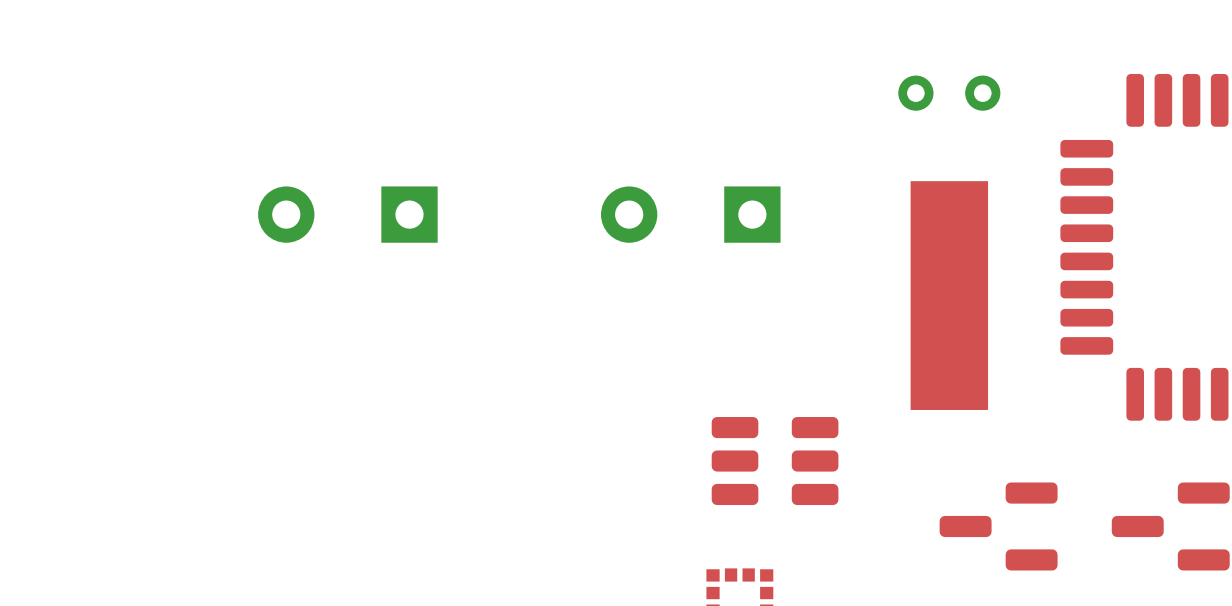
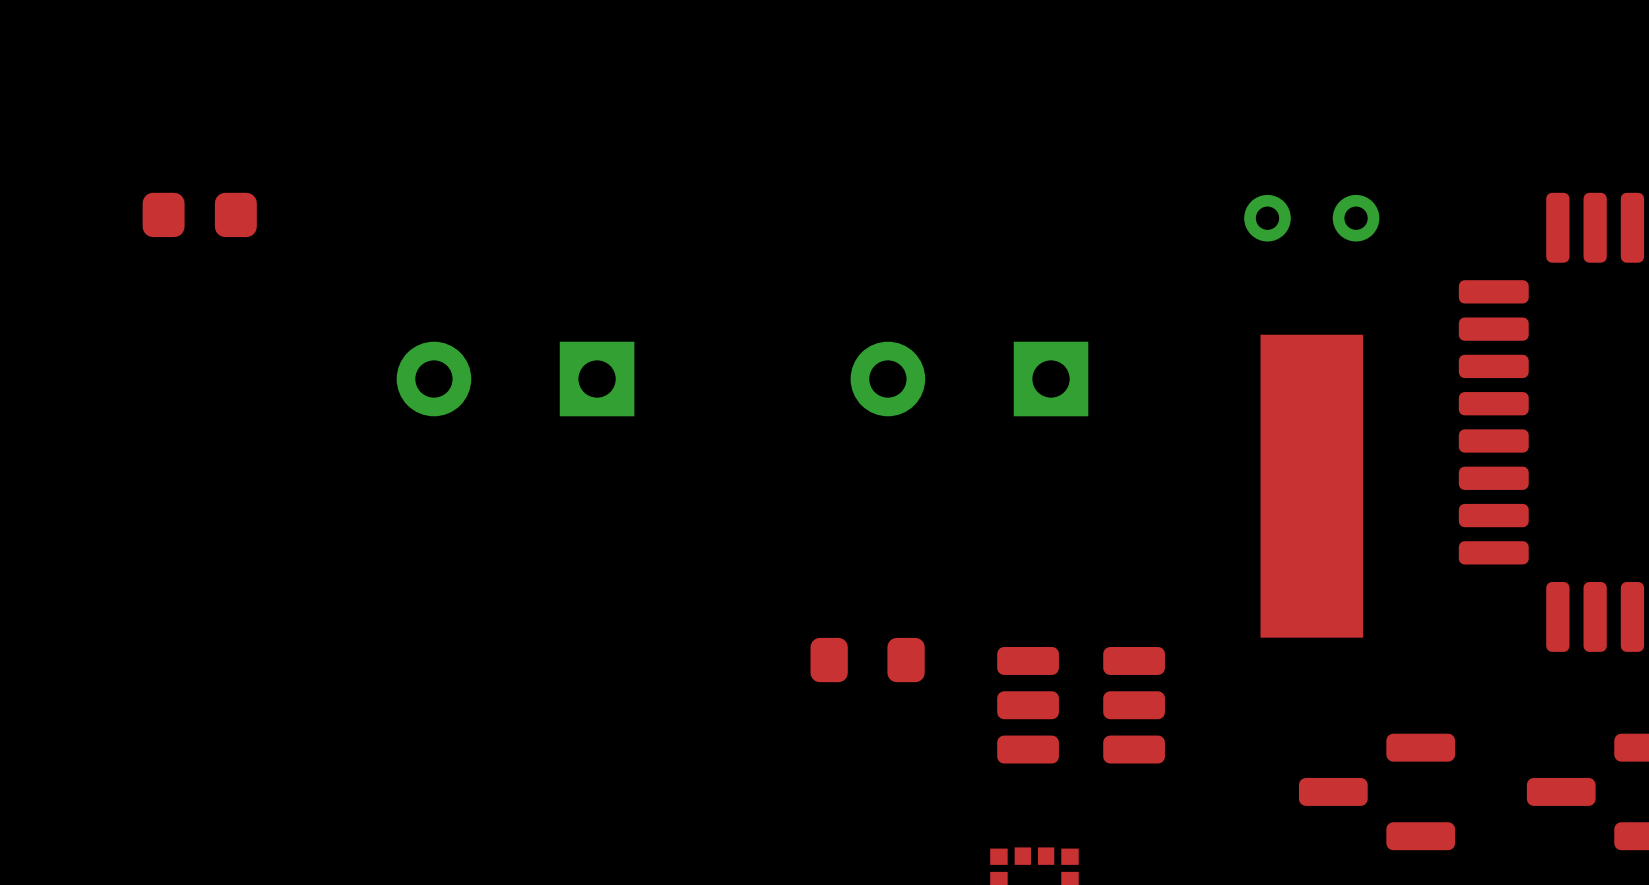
part: none -> (199, 214)
part: none -> (867, 660)

